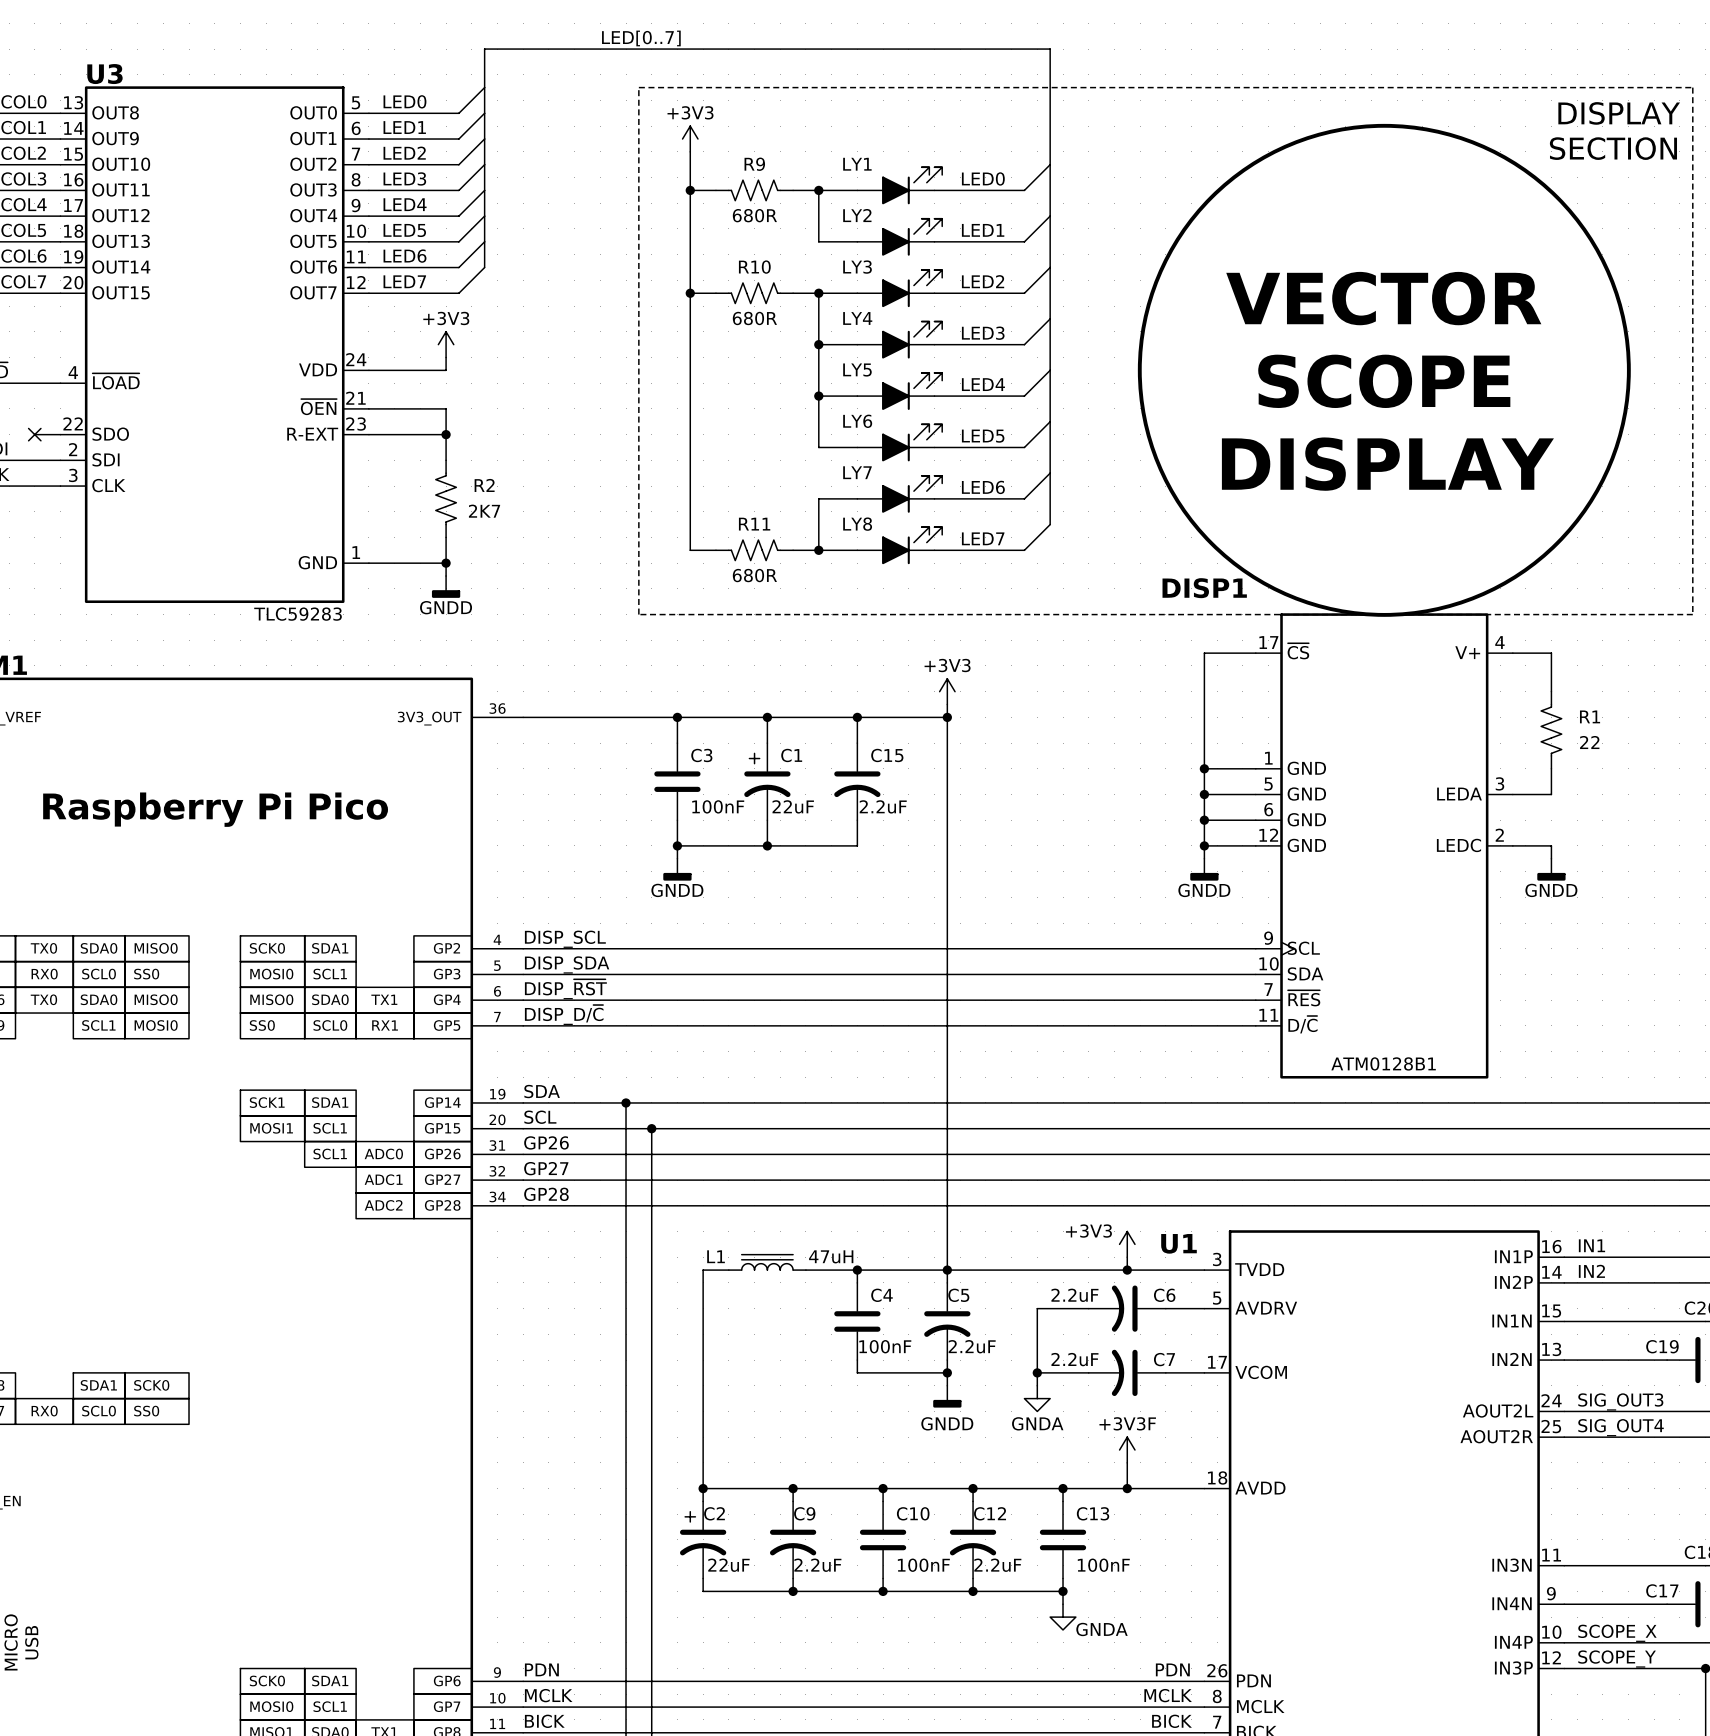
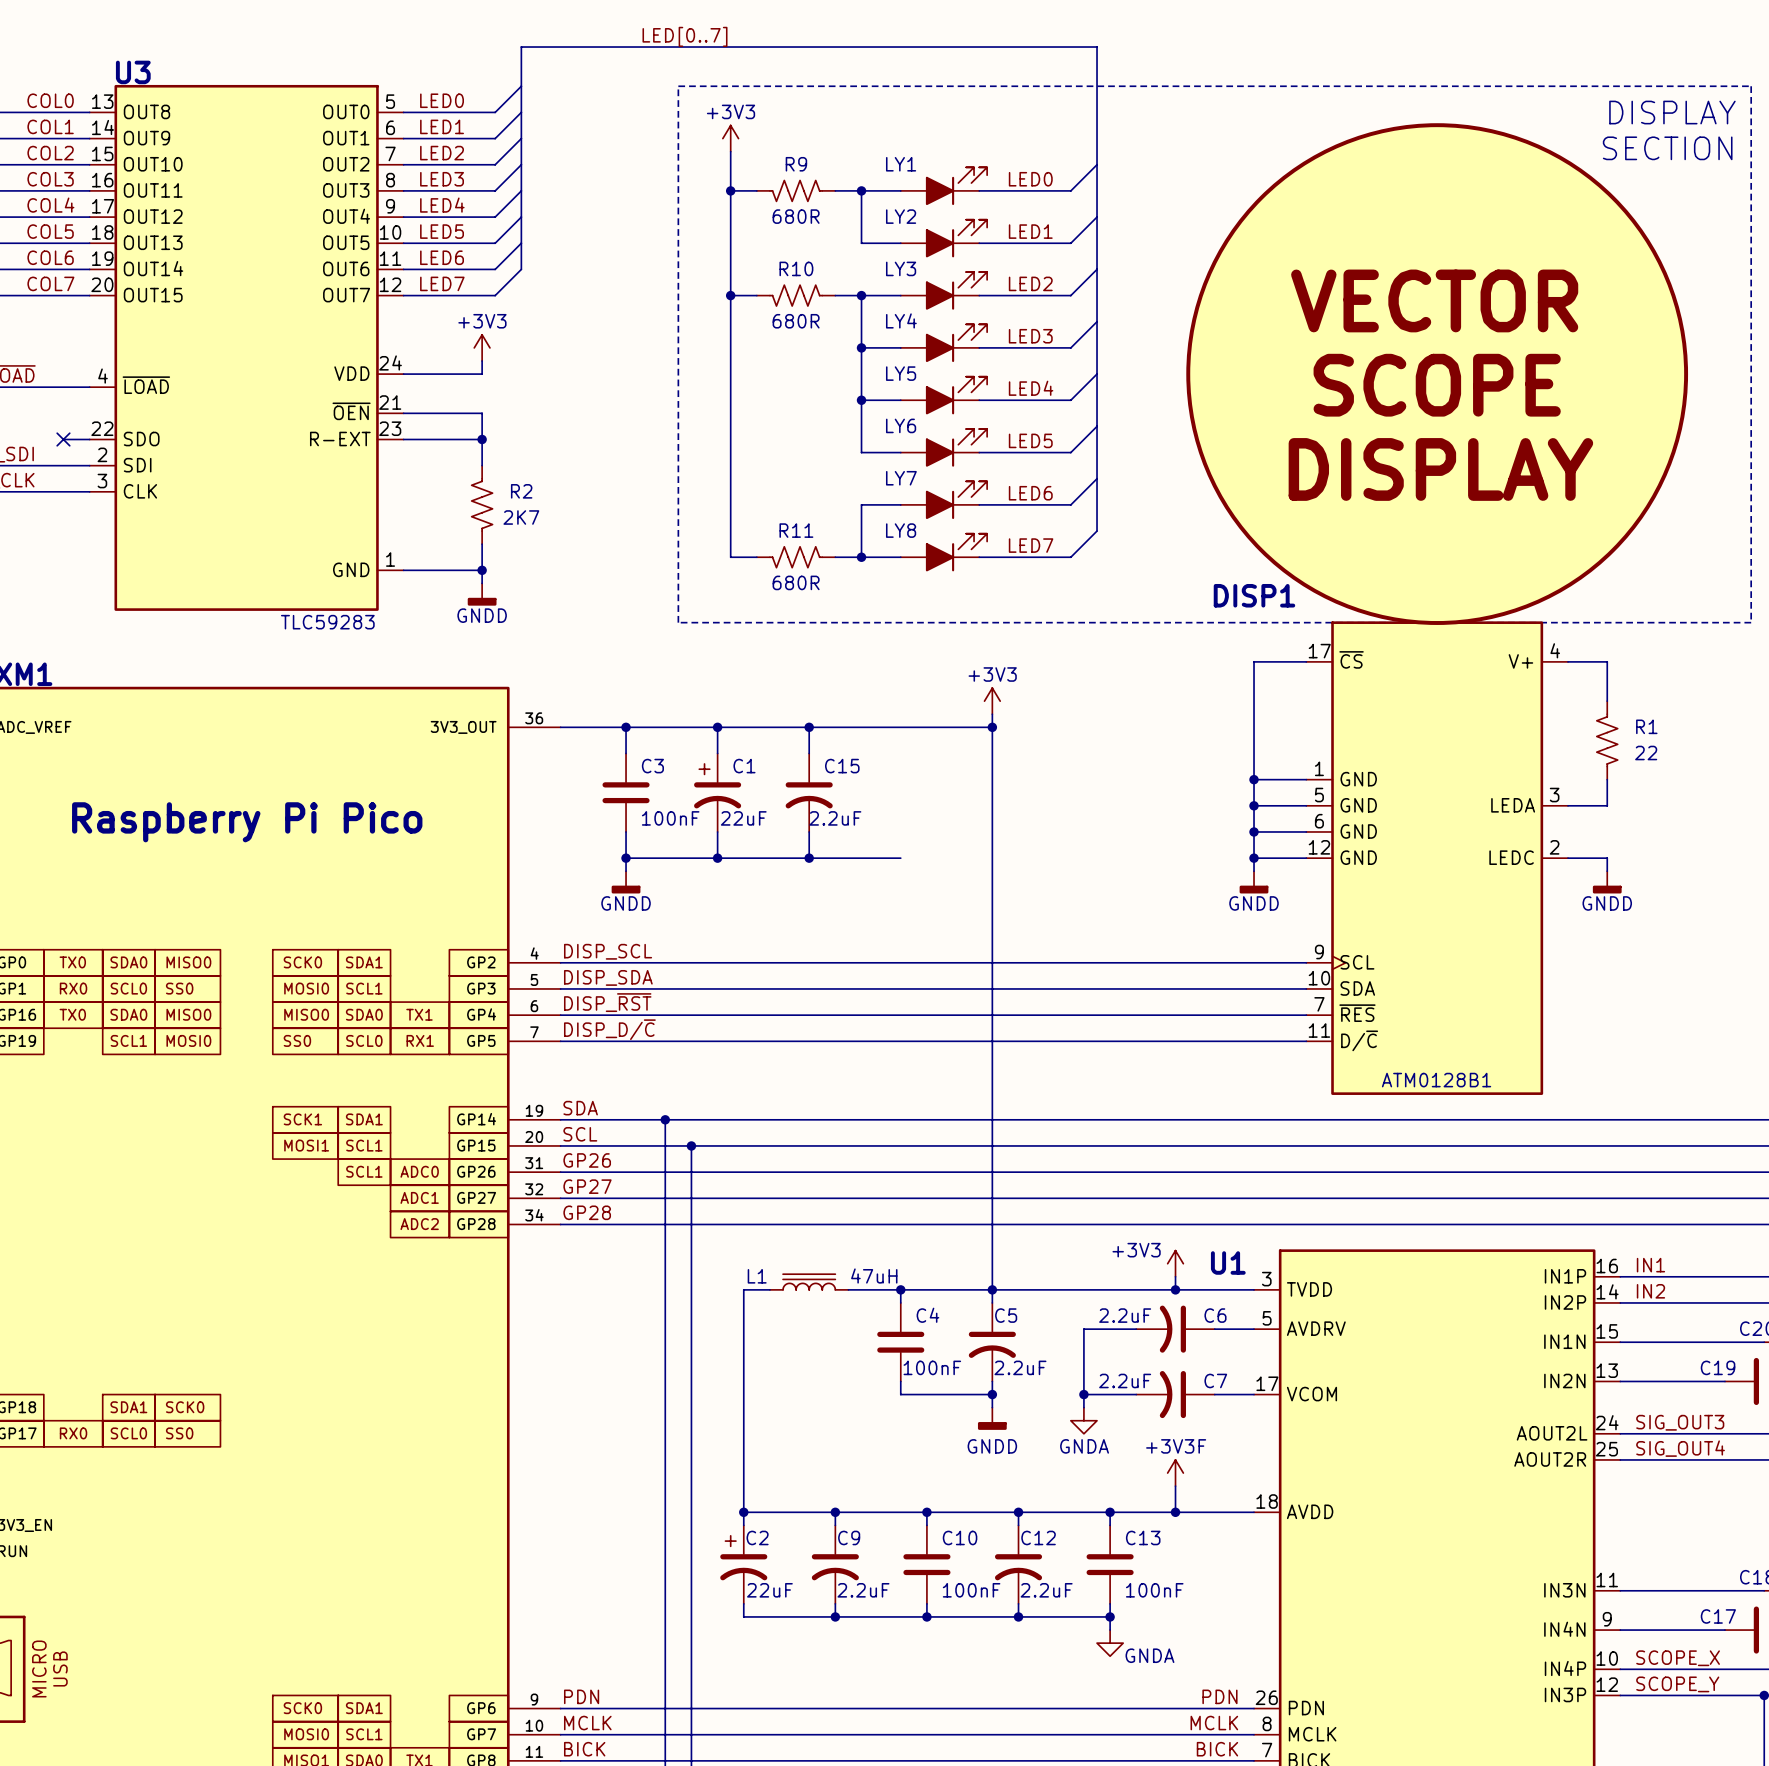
wire: none -> (626, 727) (626, 753)
junction: none -> (626, 727)
wire: (857, 717) (857, 743) -> none
junction: (857, 717) -> none
C3 position: (677, 781) -> (626, 792)
C1 position: (767, 781) -> (717, 792)
C15 position: (857, 781) -> (809, 792)
wire: none -> (626, 831) (626, 871)
wire: (857, 820) (857, 845) -> none
junction: none -> (626, 858)
wire: (677, 845) (677, 858) -> (717, 858) (626, 858)
power symbol position: GNDD (677, 869) -> GNDD (626, 882)

